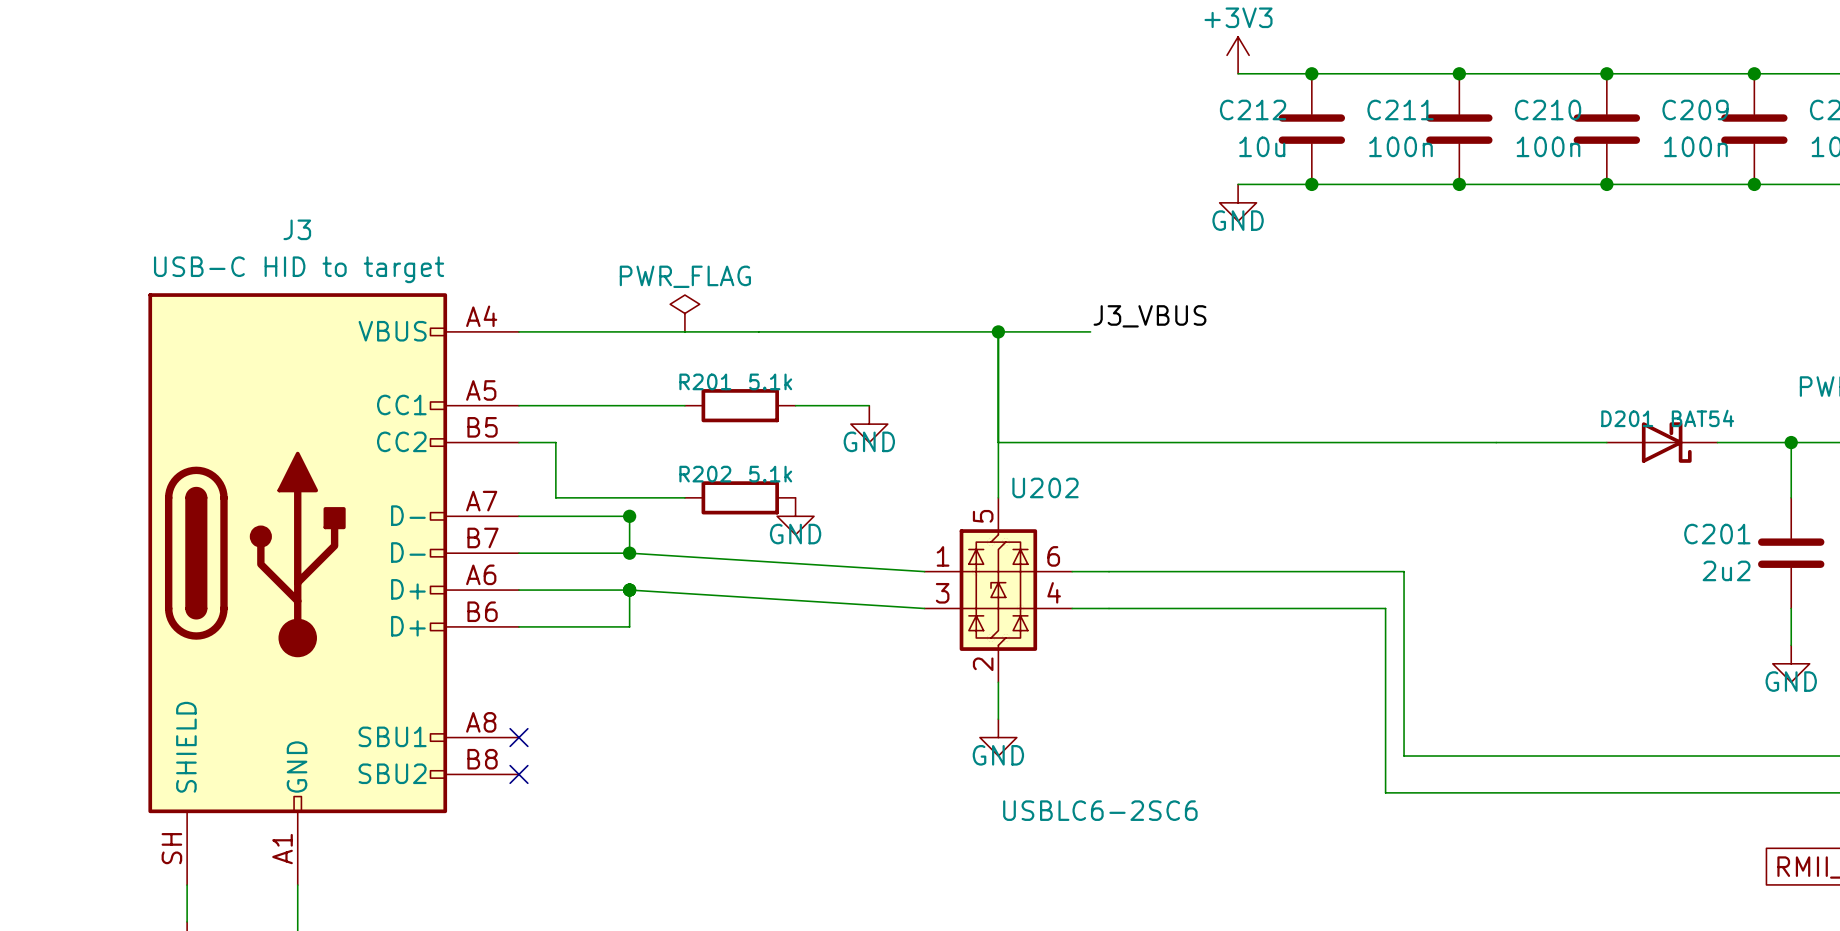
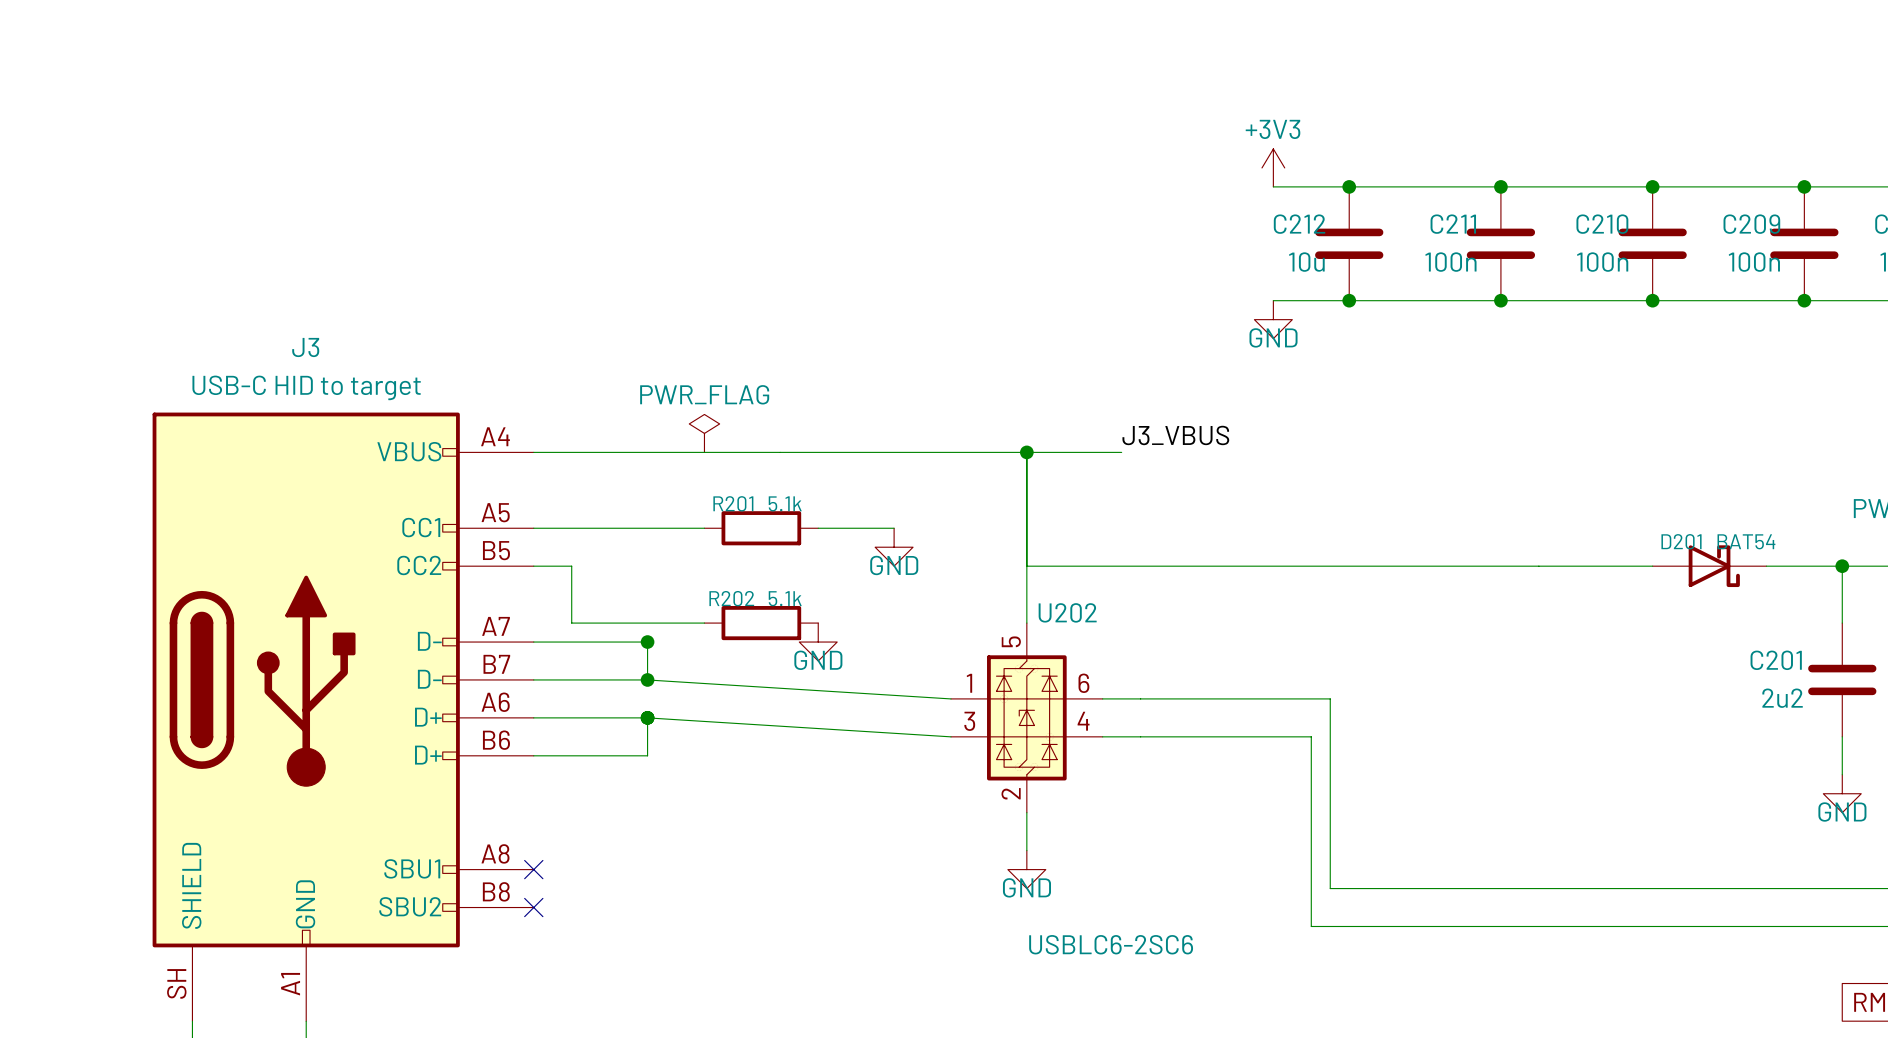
wire: (1293, 571) (1404, 571) (1404, 756) -> (1330, 698) (1330, 888) (1444, 888)
wire: (1274, 608) (1385, 608) (1385, 792) -> (1311, 736) (1311, 926) (1425, 926)

